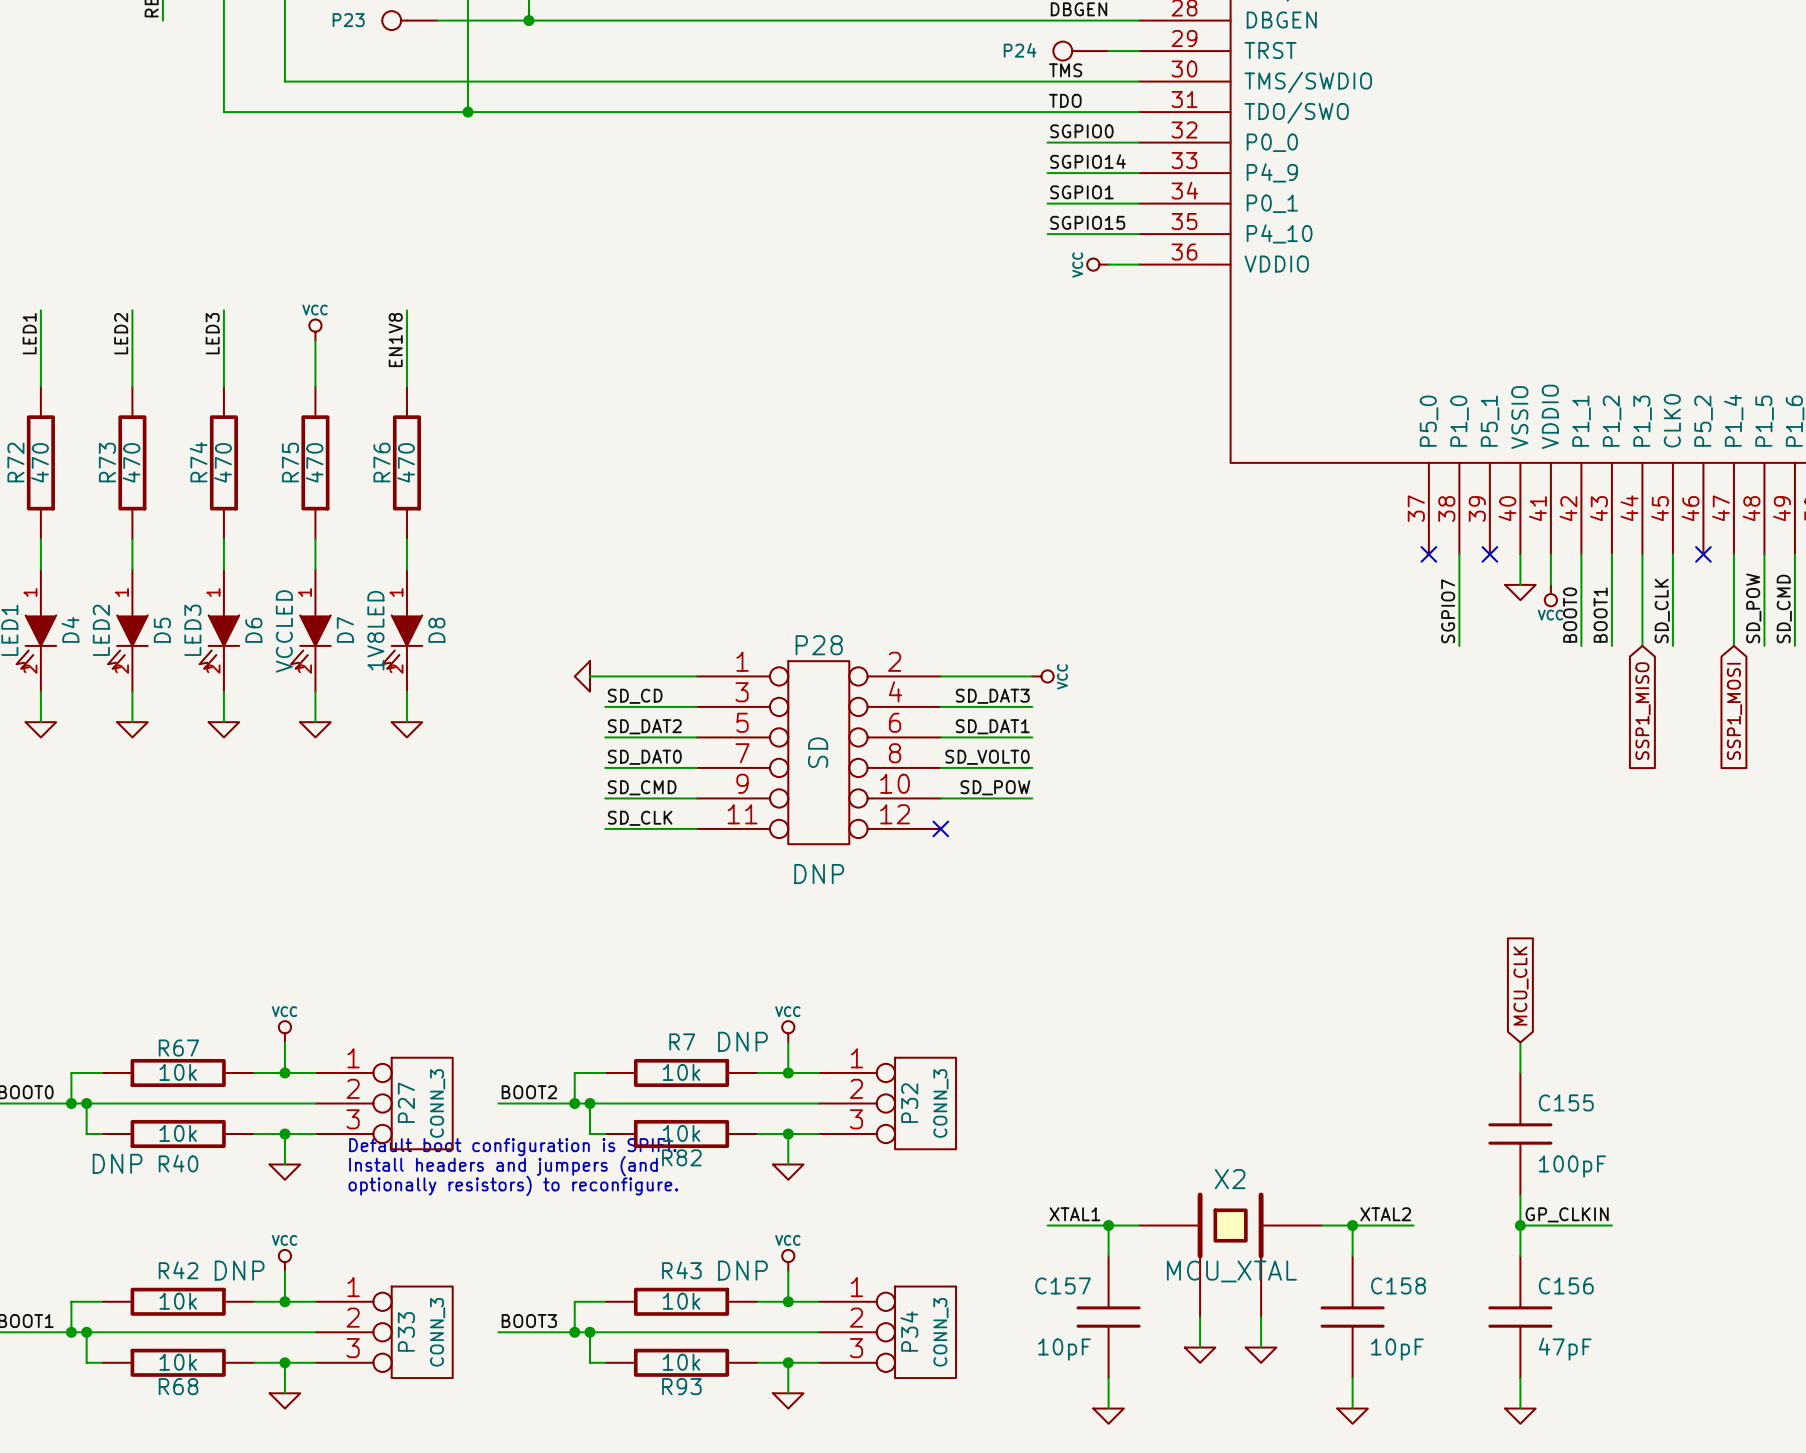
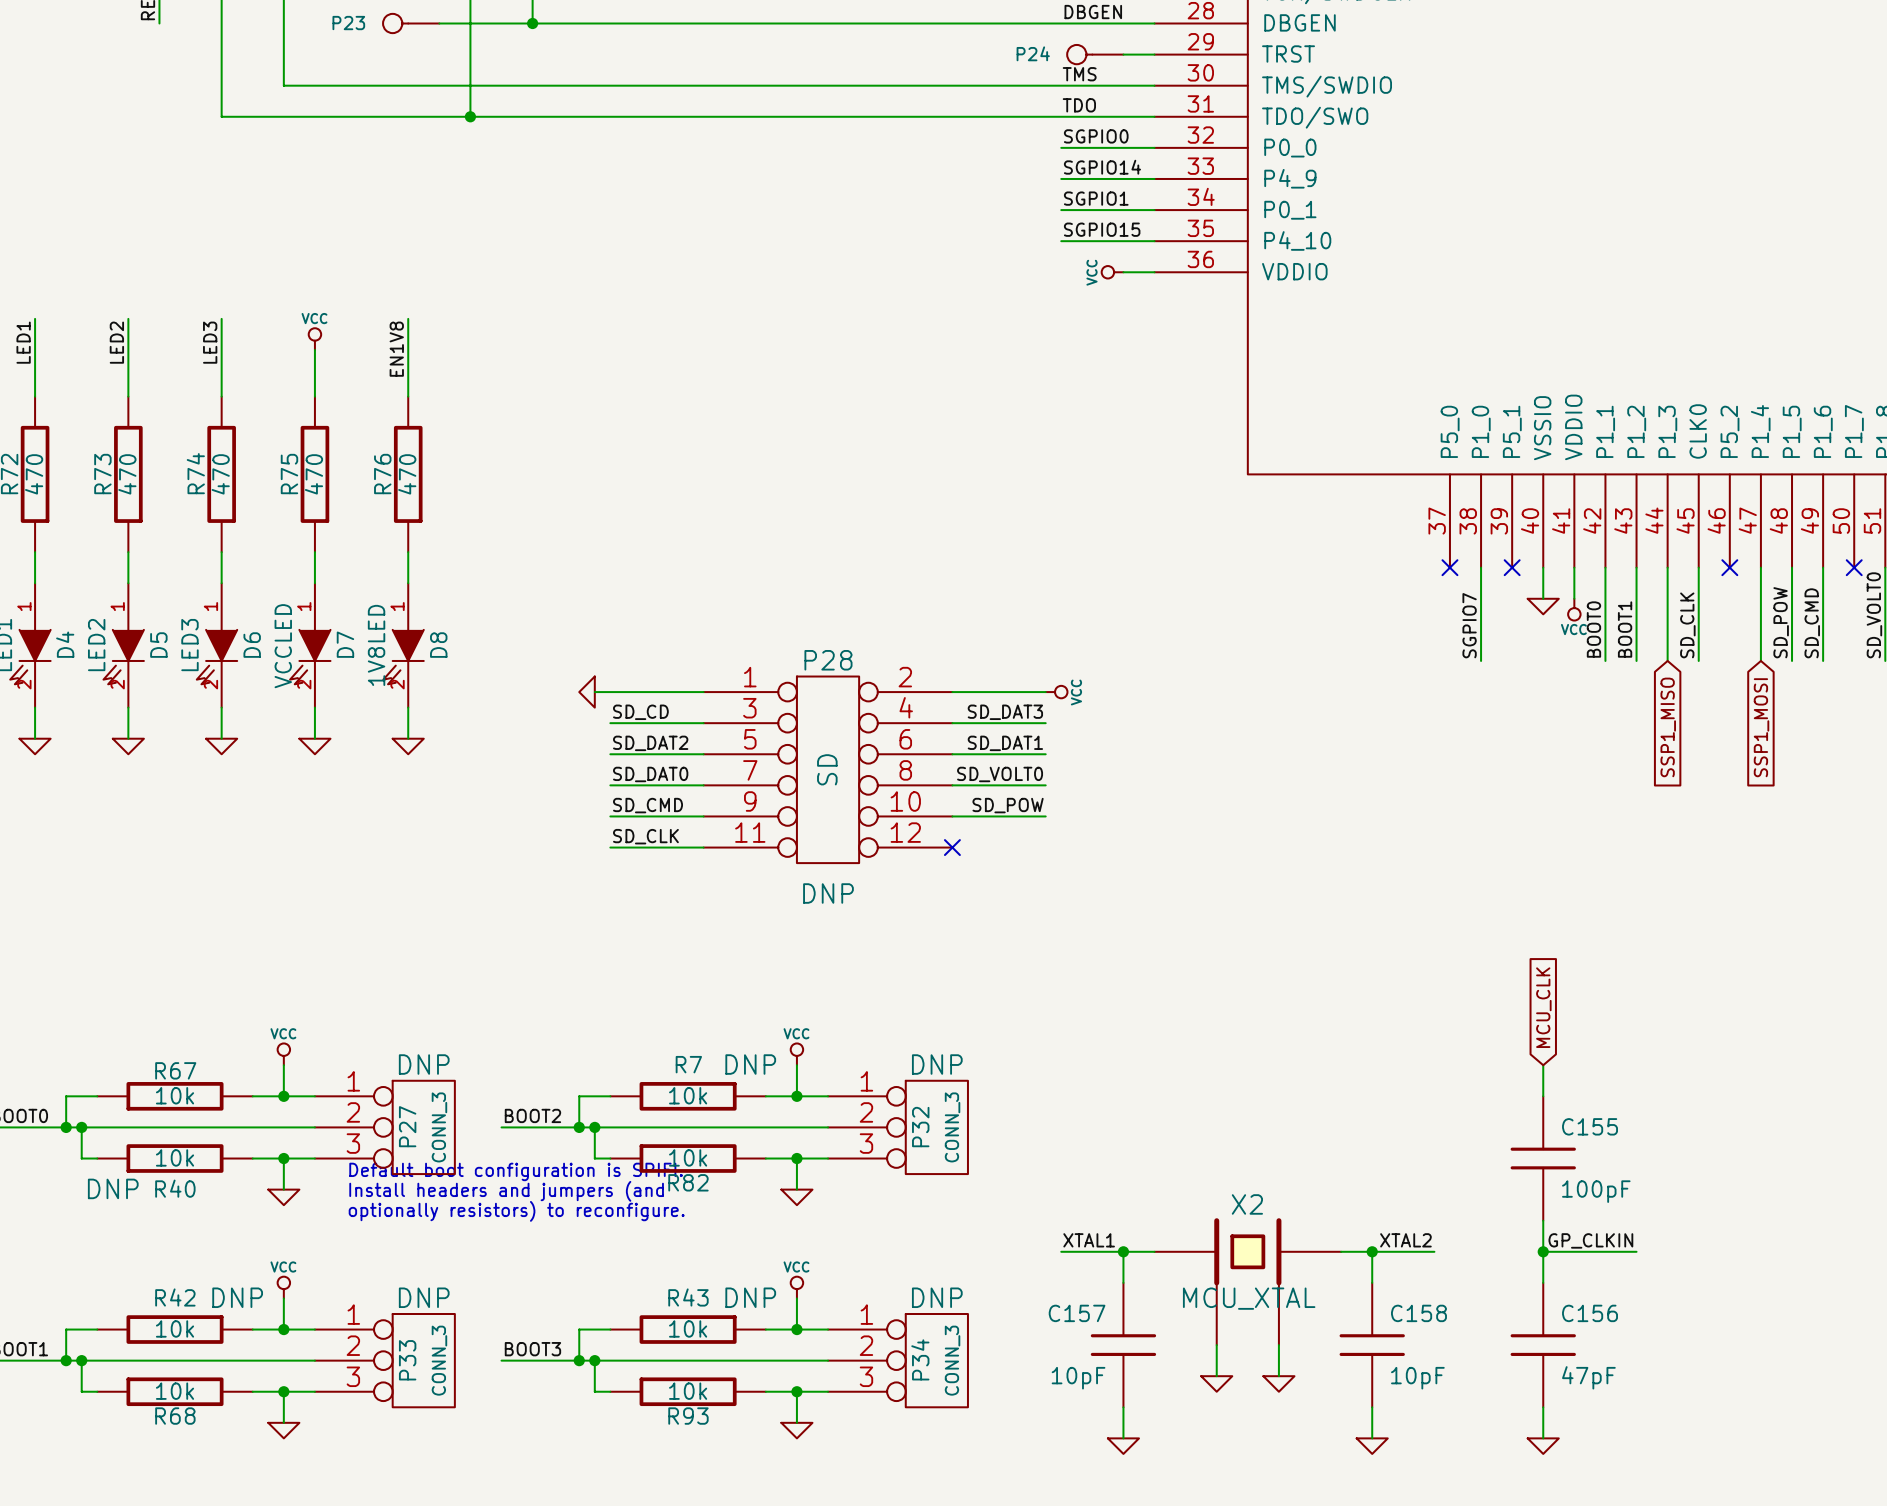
P27 text: none -> DNP (424, 1064)
P32 text: none -> DNP (937, 1064)
P33 text: none -> DNP (424, 1297)
P34 text: none -> DNP (937, 1297)

